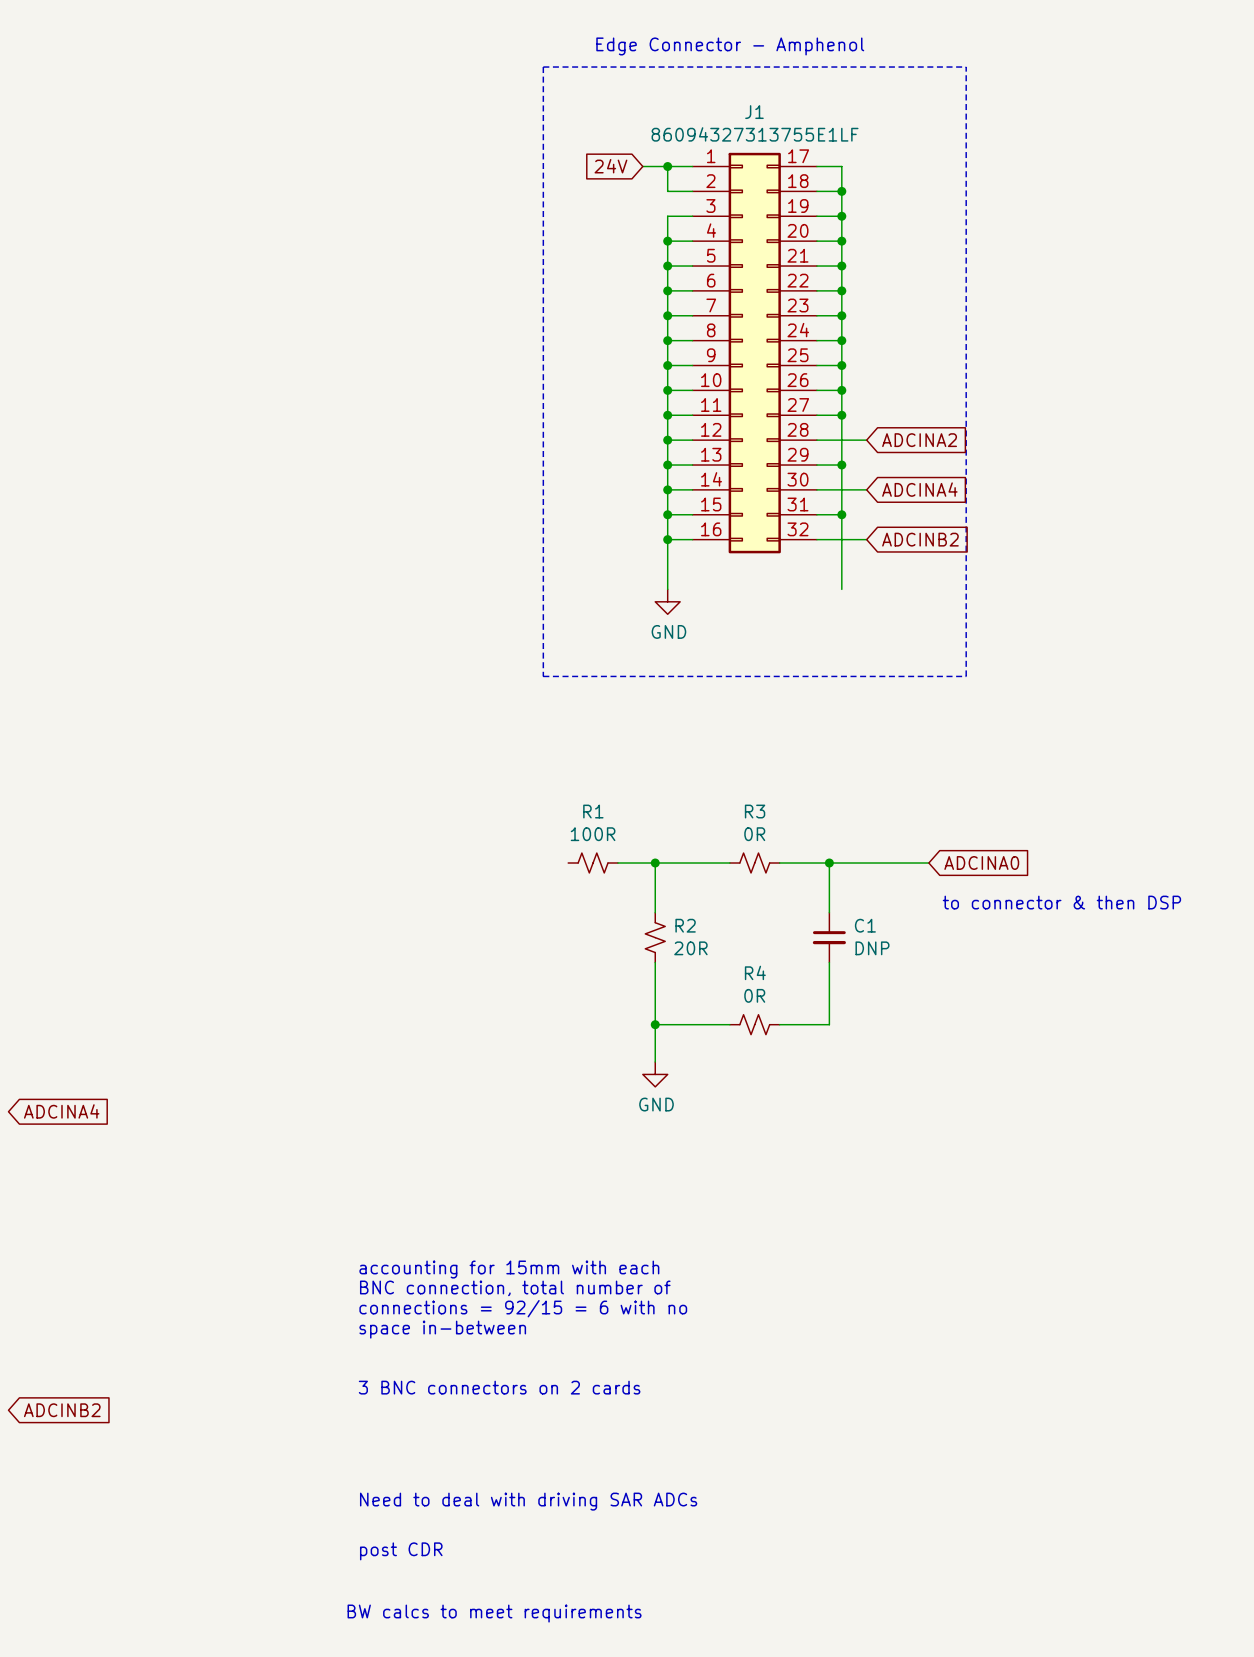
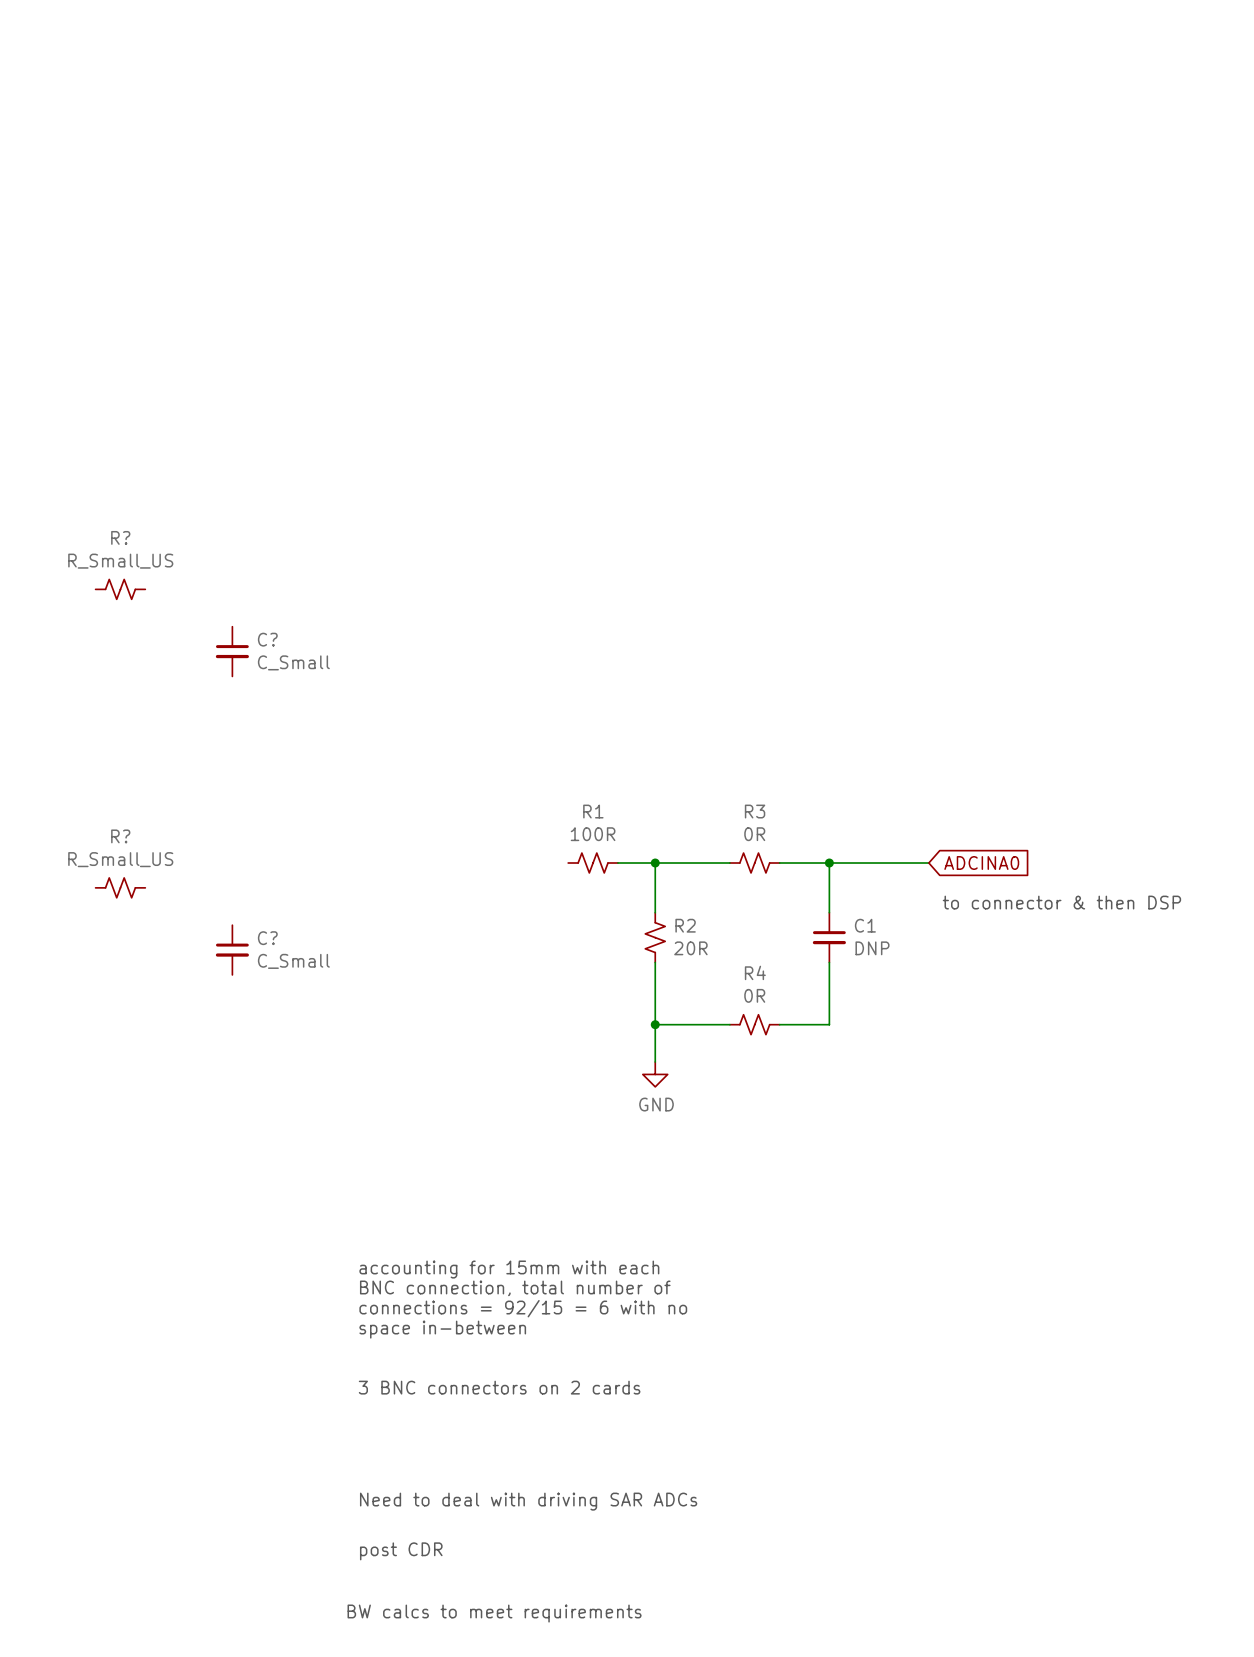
text: Edge Connector - Amphenol (730, 46) -> none
line: (543, 67) (543, 676) (966, 676) (966, 67) (543, 67) -> none
global label: 24V (610, 166) -> none
wire: (642, 166) (692, 166) -> none
wire: (667, 166) (667, 191) (692, 191) -> none
junction: (667, 166) -> none
wire: (816, 166) (841, 166) (841, 589) -> none
wire: (816, 191) (841, 191) -> none
junction: (841, 191) -> none
wire: (692, 216) (667, 216) (667, 589) -> none
wire: (816, 216) (841, 216) -> none
junction: (841, 216) -> none
wire: (667, 241) (692, 241) -> none
junction: (667, 241) -> none
wire: (816, 241) (841, 241) -> none
junction: (841, 241) -> none
wire: (667, 266) (692, 266) -> none
junction: (667, 266) -> none
wire: (816, 266) (841, 266) -> none
junction: (841, 266) -> none
wire: (667, 290) (692, 290) -> none
junction: (667, 290) -> none
wire: (816, 290) (841, 290) -> none
junction: (841, 290) -> none
wire: (667, 315) (692, 315) -> none
junction: (667, 315) -> none
wire: (816, 315) (841, 315) -> none
junction: (841, 315) -> none
wire: (667, 340) (692, 340) -> none
junction: (667, 340) -> none
wire: (816, 340) (841, 340) -> none
junction: (841, 340) -> none
J1: 86094327313755E1LF (754, 353) -> none
wire: (667, 365) (692, 365) -> none
junction: (667, 365) -> none
wire: (816, 365) (841, 365) -> none
junction: (841, 365) -> none
wire: (667, 390) (692, 390) -> none
junction: (667, 390) -> none
wire: (816, 390) (841, 390) -> none
junction: (841, 390) -> none
wire: (667, 415) (692, 415) -> none
junction: (667, 415) -> none
wire: (816, 415) (841, 415) -> none
junction: (841, 415) -> none
wire: (667, 440) (692, 440) -> none
junction: (667, 440) -> none
wire: (816, 440) (866, 440) -> none
global label: ADCINA2 (919, 440) -> none
wire: (667, 465) (692, 465) -> none
junction: (667, 465) -> none
wire: (816, 465) (841, 465) -> none
junction: (841, 465) -> none
wire: (667, 489) (692, 489) -> none
junction: (667, 489) -> none
wire: (816, 489) (866, 489) -> none
global label: ADCINA4 (919, 489) -> none
wire: (667, 514) (692, 514) -> none
junction: (667, 514) -> none
wire: (816, 514) (841, 514) -> none
junction: (841, 514) -> none
wire: (667, 539) (692, 539) -> none
junction: (667, 539) -> none
wire: (816, 539) (866, 539) -> none
global label: ADCINB2 (920, 539) -> none
R?: none -> R_Small_US (120, 589)
power symbol: GND (667, 601) -> none
C?: none -> C_Small (232, 651)
R?: none -> R_Small_US (120, 887)
C?: none -> C_Small (232, 950)
global label: ADCINA4 (61, 1111) -> none
global label: ADCINB2 (62, 1410) -> none

